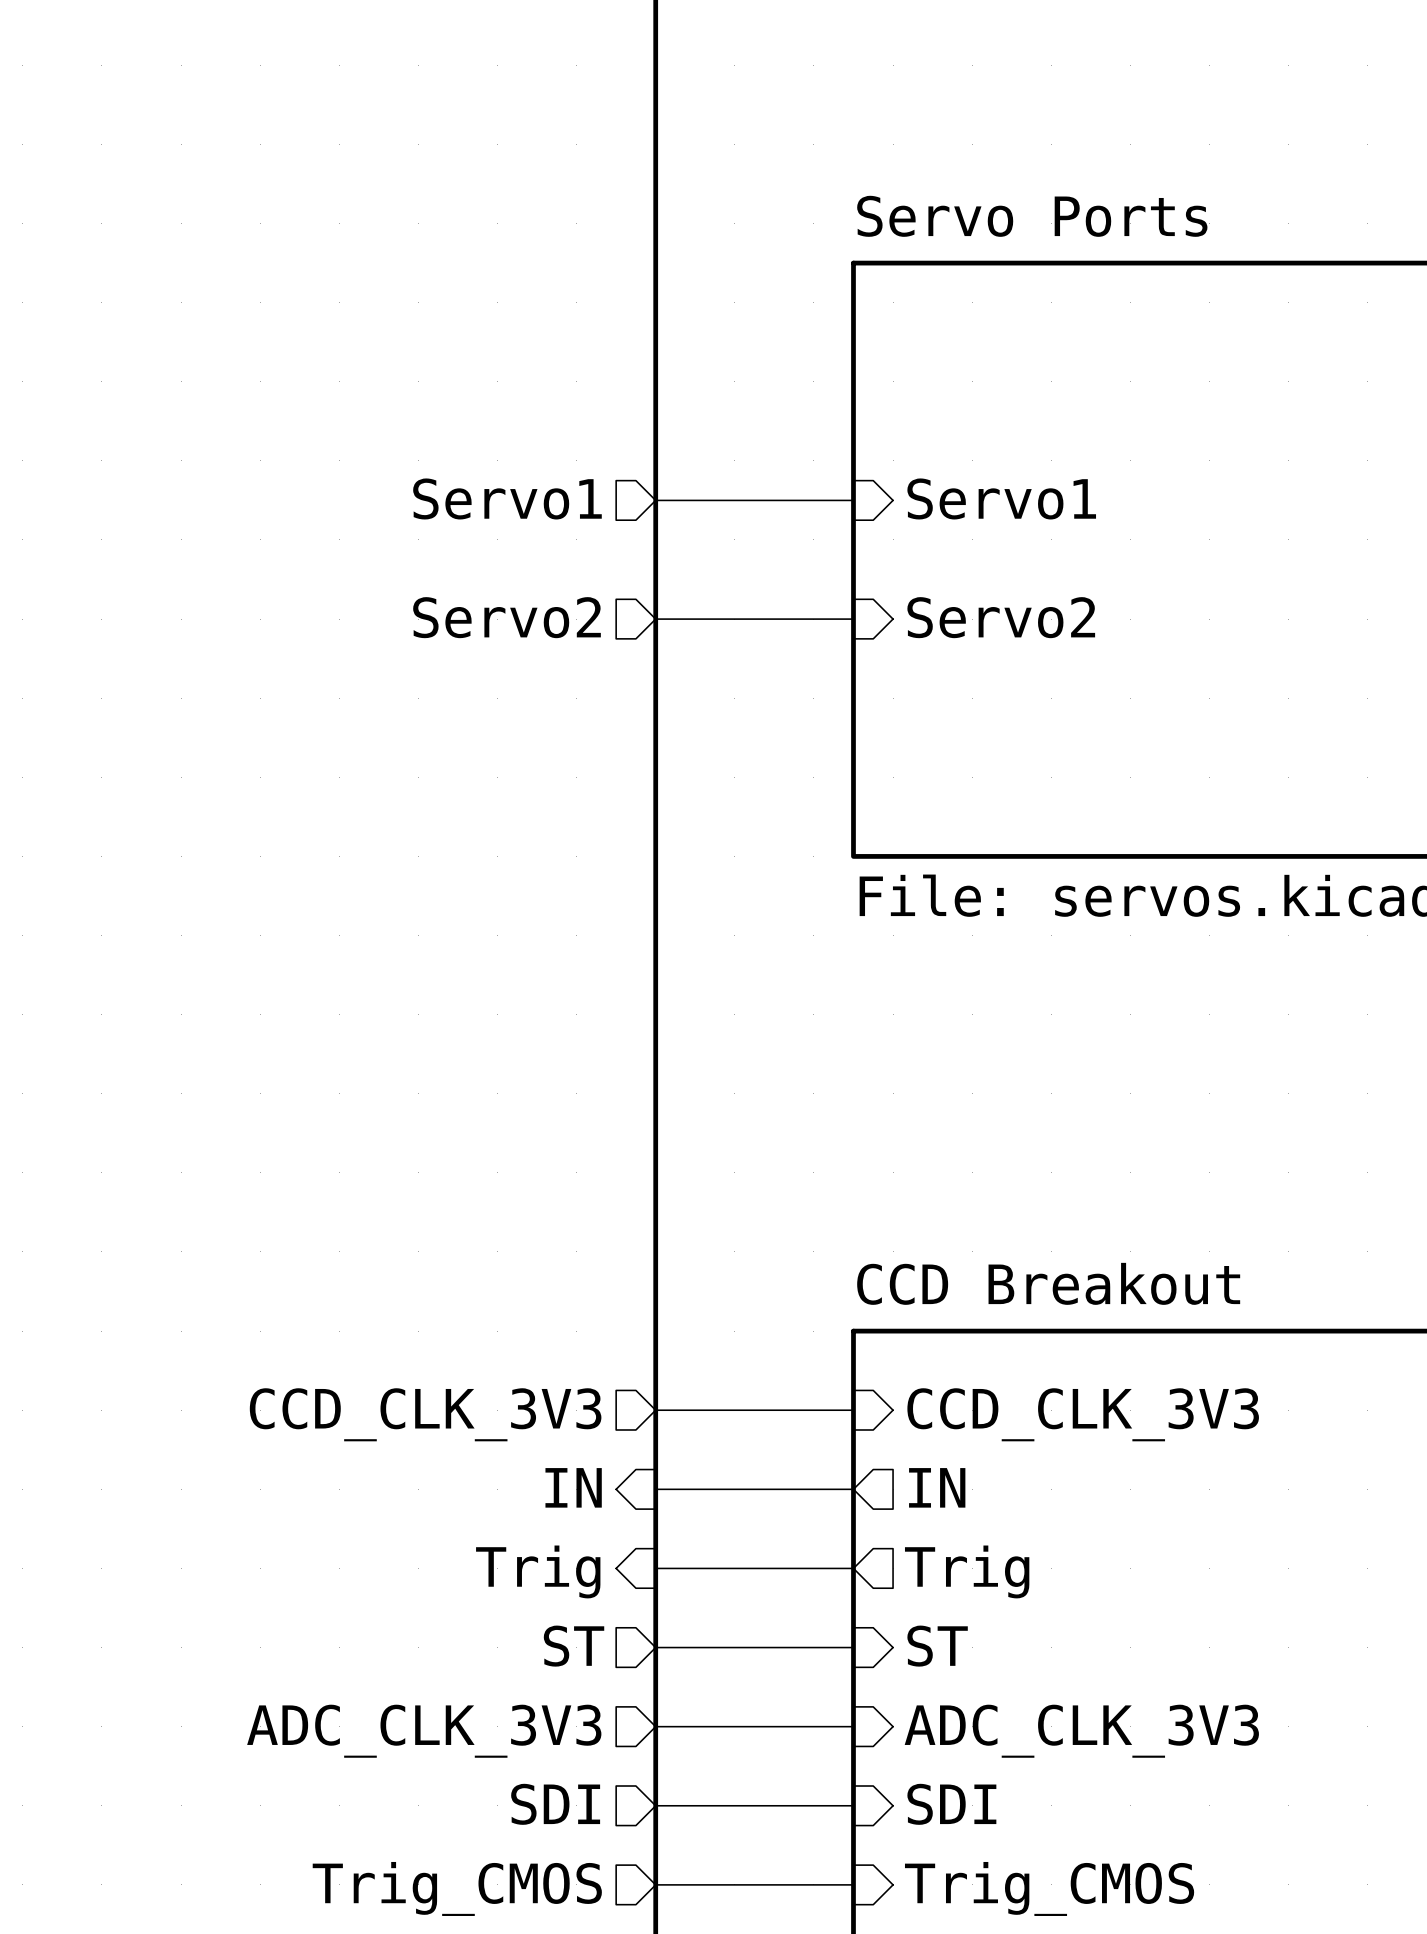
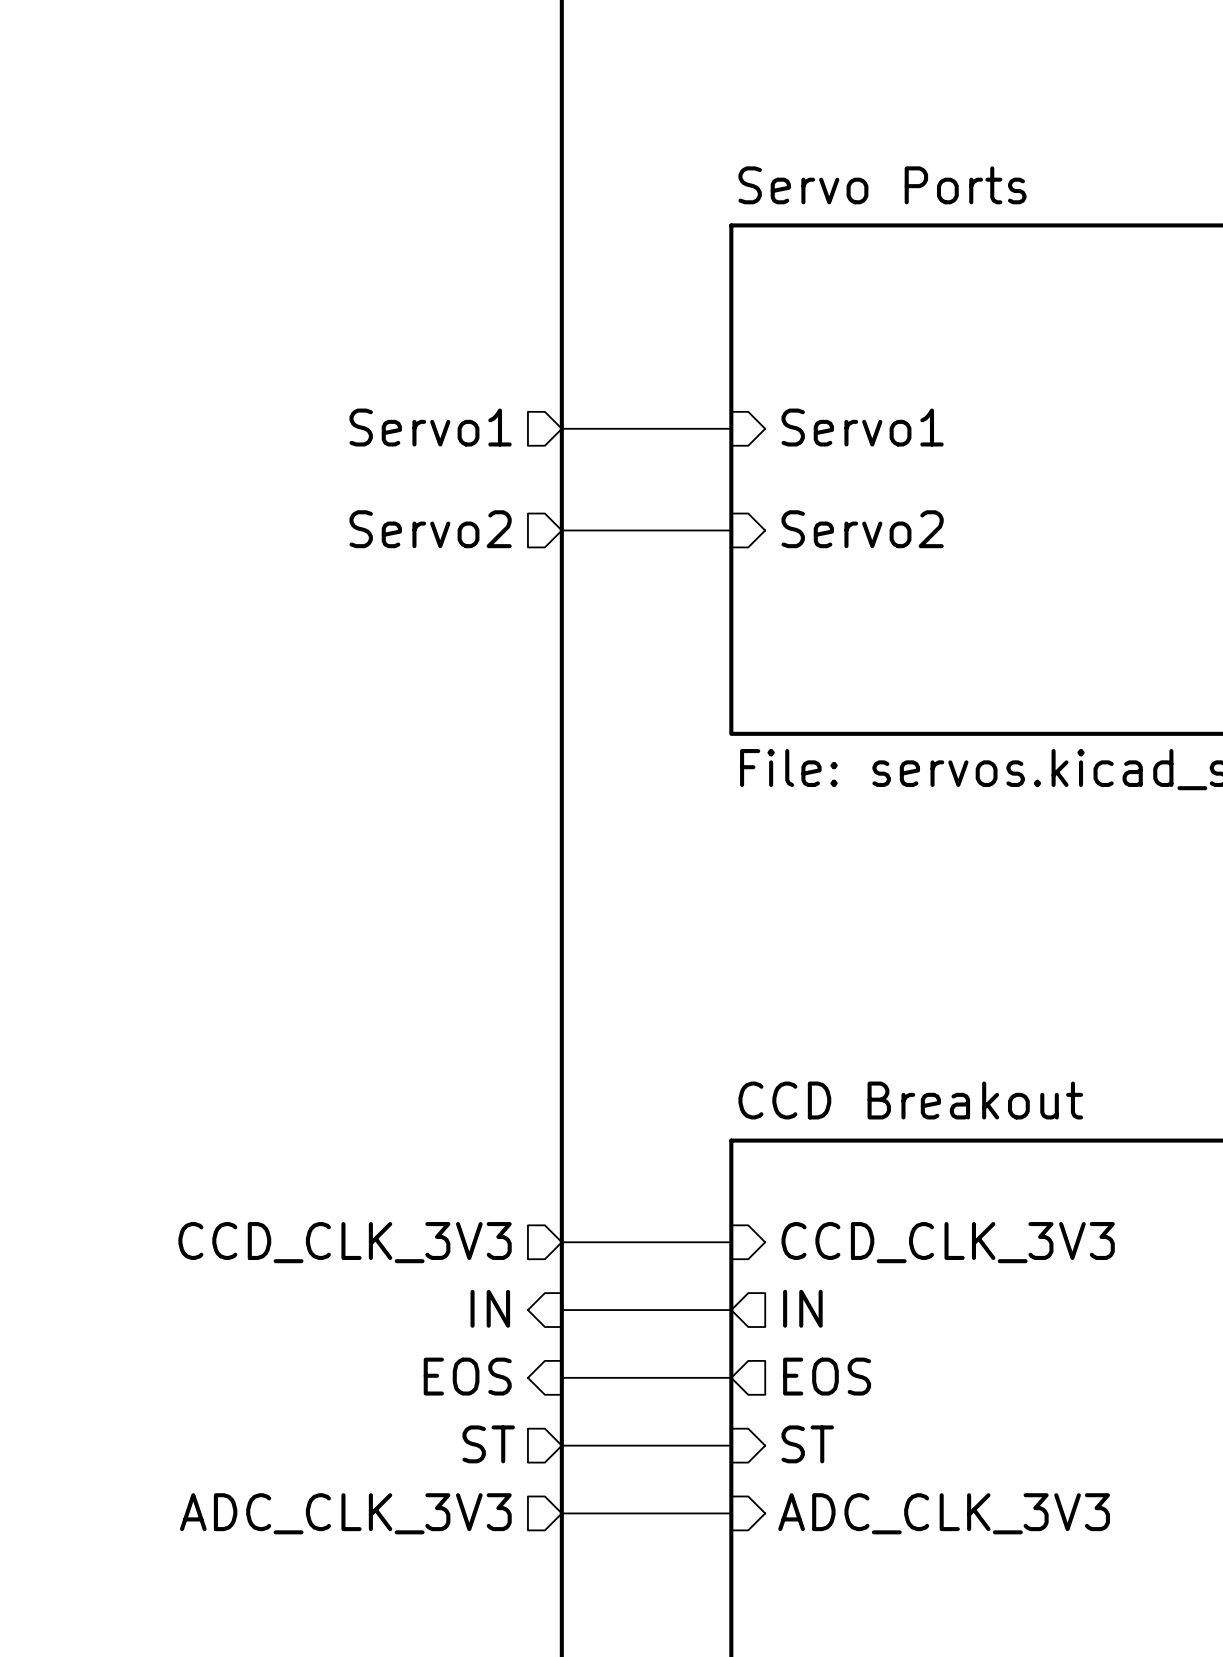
wire: (655, 1410) (853, 1410) -> (561, 1310) (731, 1310)
sheet pin position: CCD_CLK_3V3 (425, 1414) -> CCD_CLK_3V3 (345, 1242)
sheet pin position: CCD_CLK_3V3 (1083, 1414) -> CCD_CLK_3V3 (948, 1242)
sheet pin position: IN (573, 1487) -> IN (490, 1308)
sheet pin position: IN (937, 1487) -> IN (802, 1308)
wire: (655, 1489) (853, 1489) -> (561, 1242) (731, 1242)
wire: (655, 1568) (853, 1568) -> (561, 1377) (731, 1377)
sheet pin: Trig (538, 1571) -> none
sheet pin: Trig (967, 1571) -> none
sheet pin: none -> EOS (467, 1376)
sheet pin: none -> EOS (827, 1376)
sheet pin position: ST (574, 1646) -> ST (488, 1444)
sheet pin position: ST (937, 1646) -> ST (807, 1444)
wire: (655, 1647) (853, 1647) -> (561, 1445) (731, 1445)
wire: (655, 1726) (853, 1726) -> (561, 1513) (731, 1513)
sheet pin position: ADC_CLK_3V3 (424, 1731) -> ADC_CLK_3V3 (345, 1513)
sheet pin position: ADC_CLK_3V3 (1081, 1731) -> ADC_CLK_3V3 (944, 1513)
sheet pin: SDI (555, 1804) -> none
sheet pin: SDI (951, 1804) -> none
wire: (655, 1805) (853, 1805) -> none
wire: (655, 1884) (853, 1884) -> none
sheet pin: Trig_CMOS (457, 1888) -> none
sheet pin: Trig_CMOS (1049, 1888) -> none

